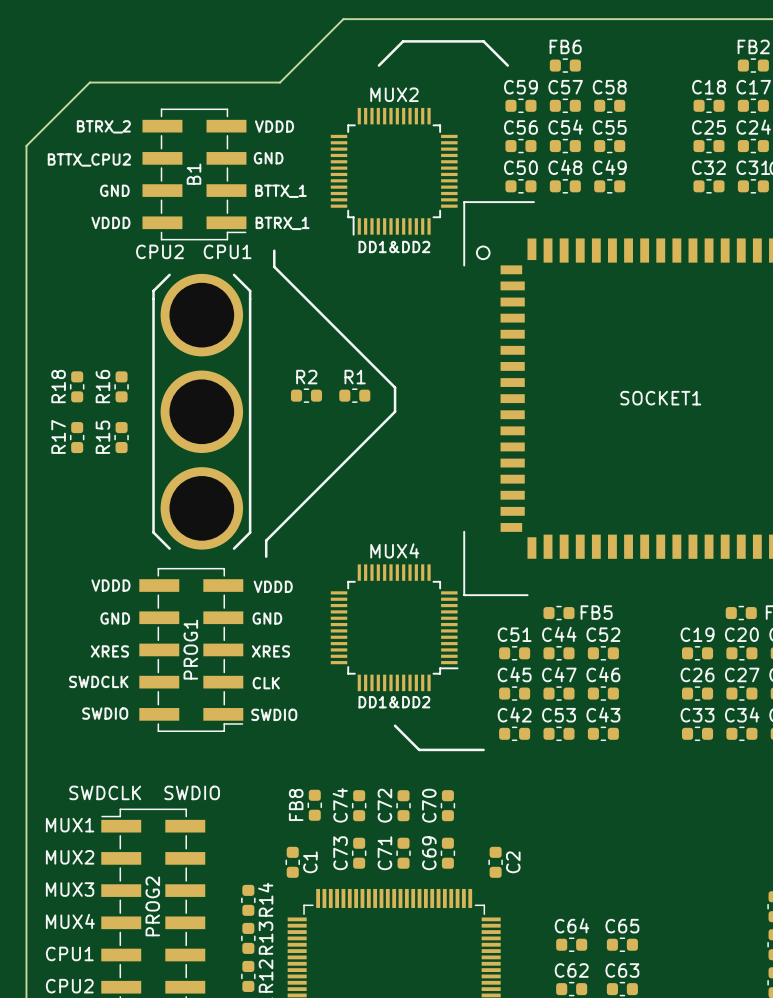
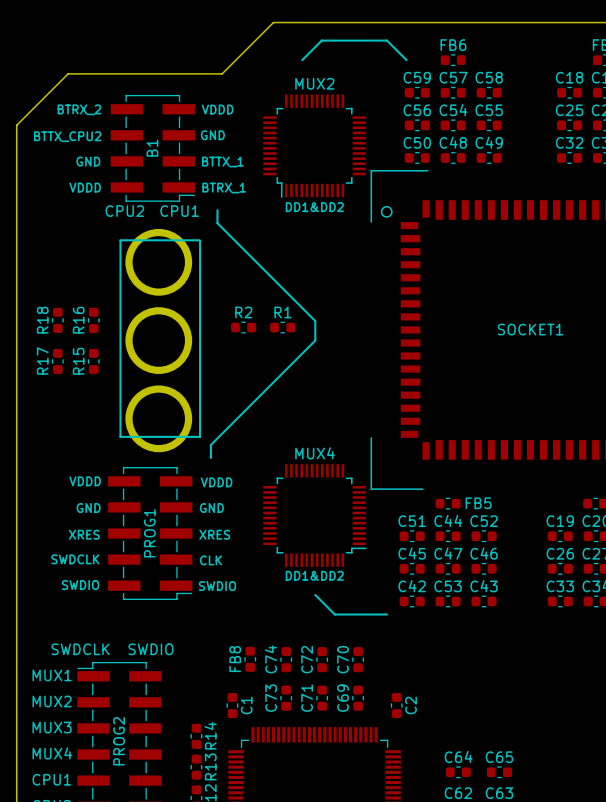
line: (169, 274) (153, 290) (153, 532) (169, 548) -> none
line: (234, 274) (250, 290) (250, 532) (234, 548) -> none
line: none -> (120, 240) (199, 240)
line: none -> (120, 240) (120, 436) (200, 436) (200, 240)

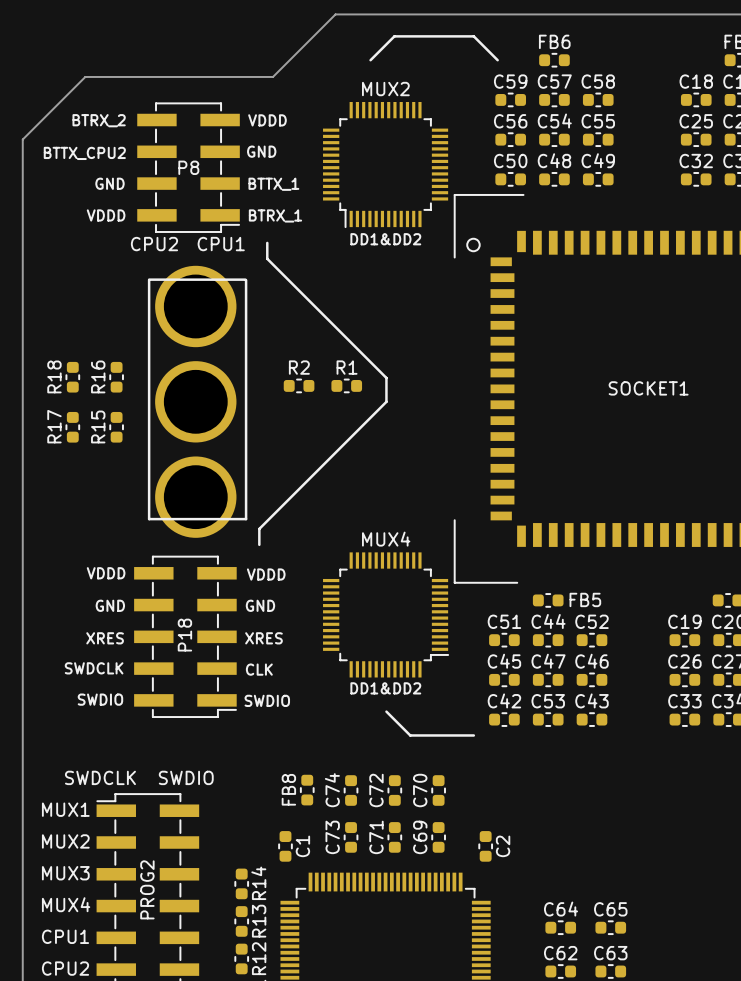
B1 name: B1 (152, 148) -> P8 (188, 167)
PROG1 name: PROG1 (149, 533) -> P18 (184, 635)

